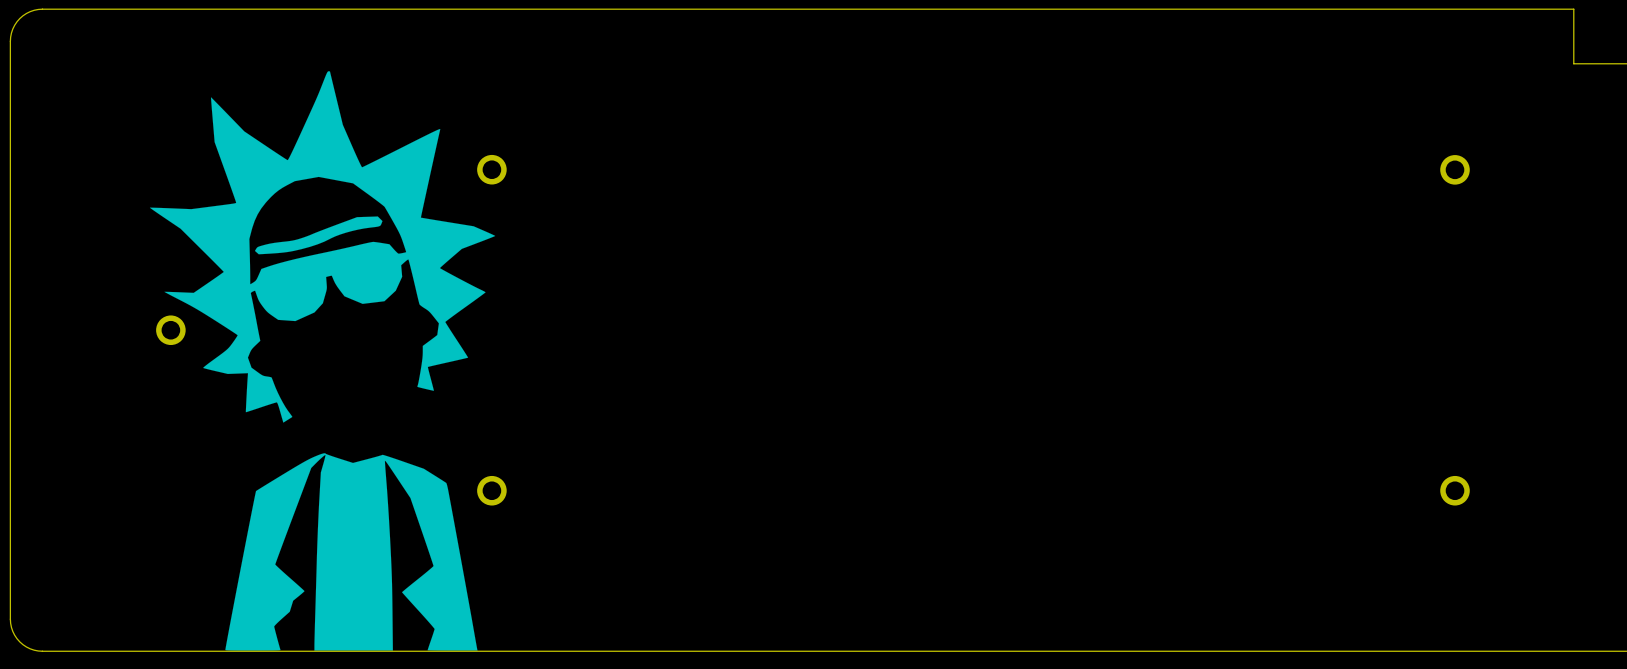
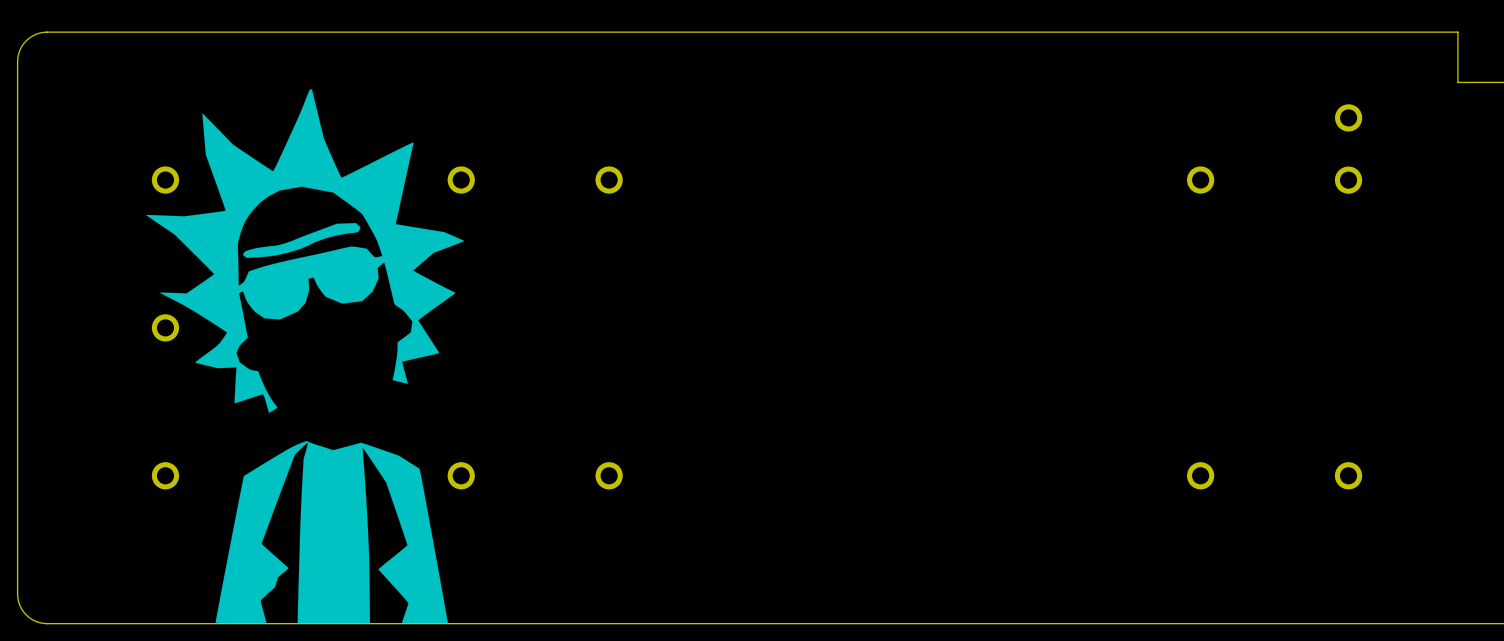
part: none -> (1348, 117)
part: none -> (165, 180)
part: none -> (609, 180)
part: none -> (1200, 180)
part: none -> (165, 475)
part: none -> (609, 475)
part: none -> (1200, 475)

